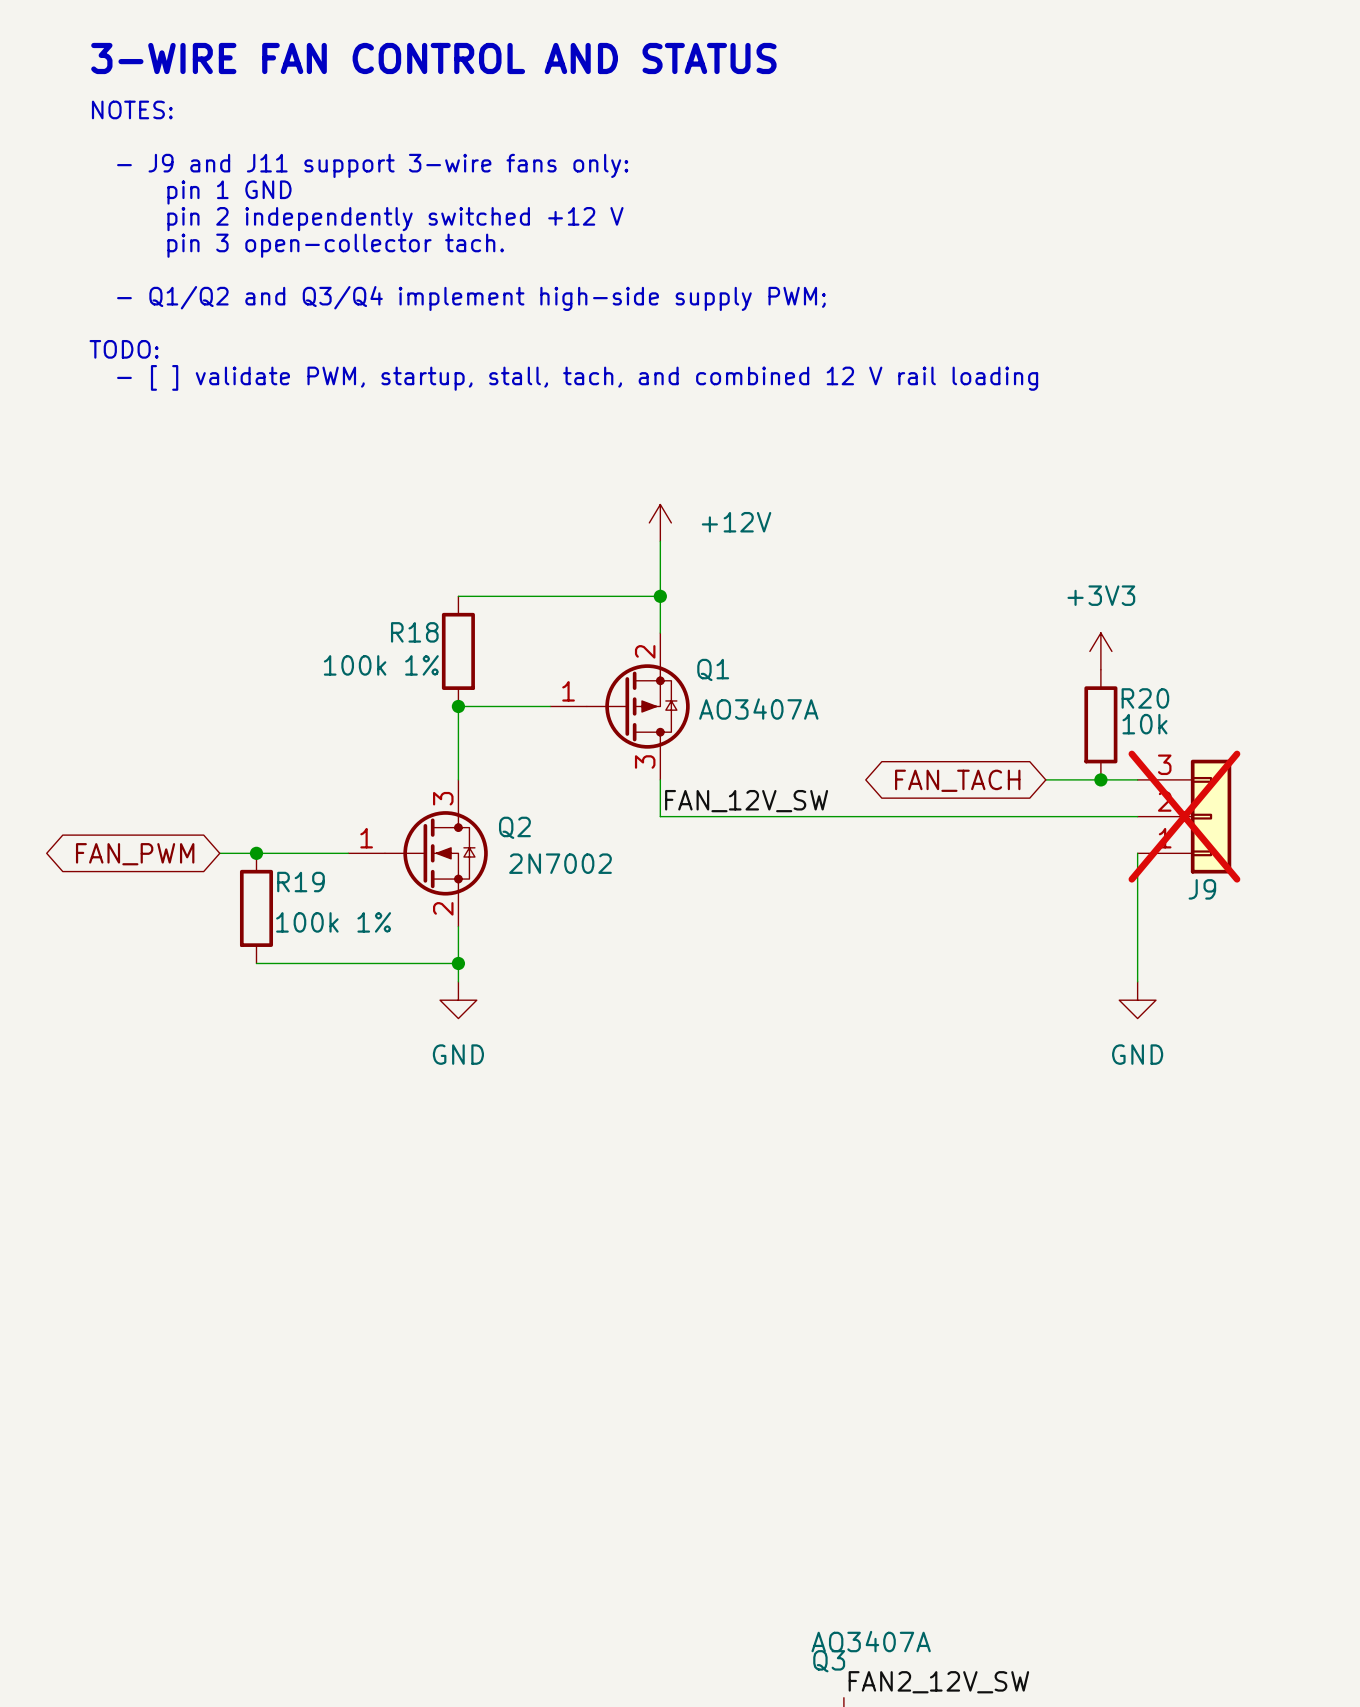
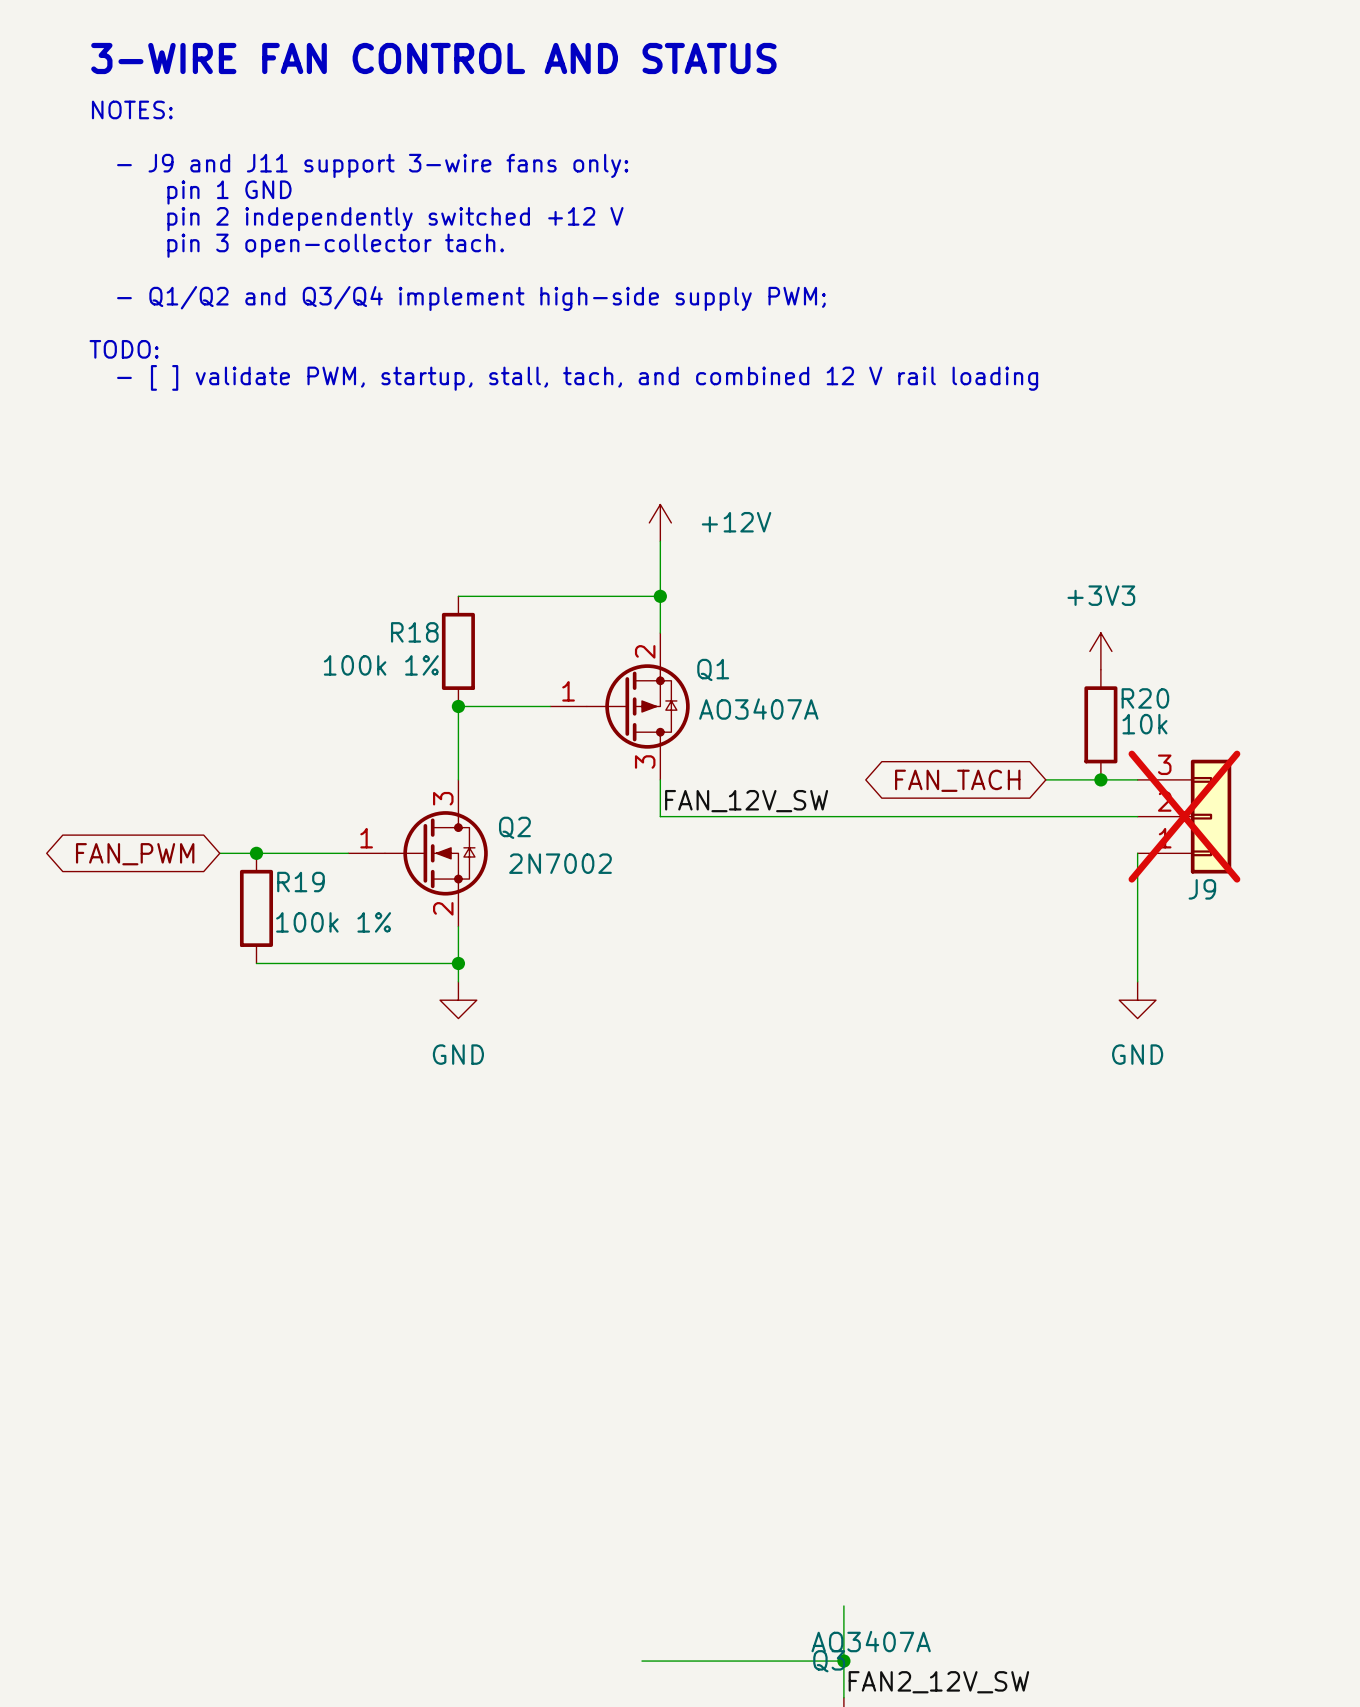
wire: none -> (843, 1605) (843, 1697)
wire: none -> (641, 1661) (843, 1661)
junction: none -> (843, 1661)

